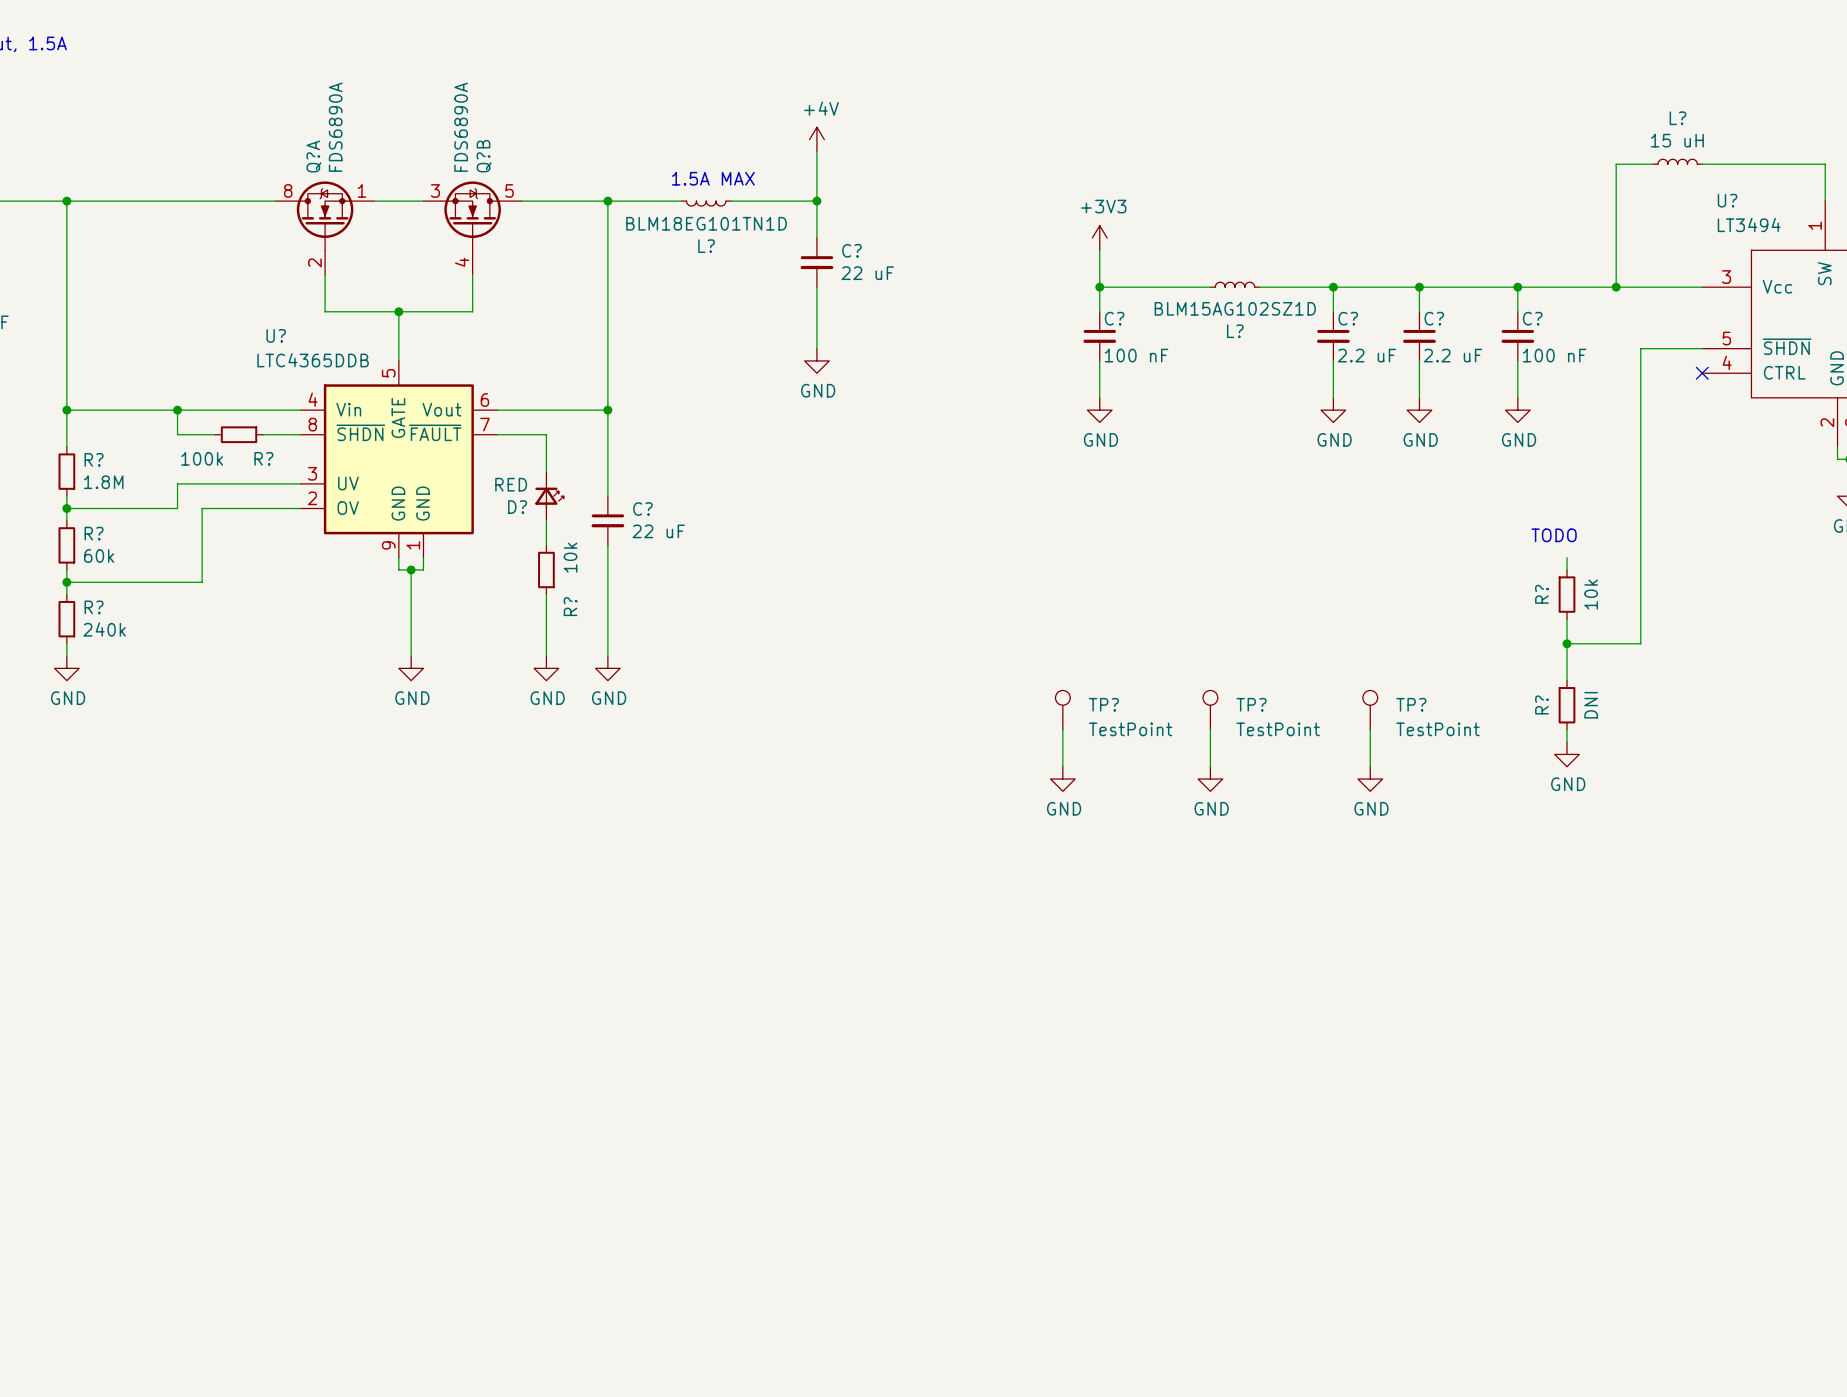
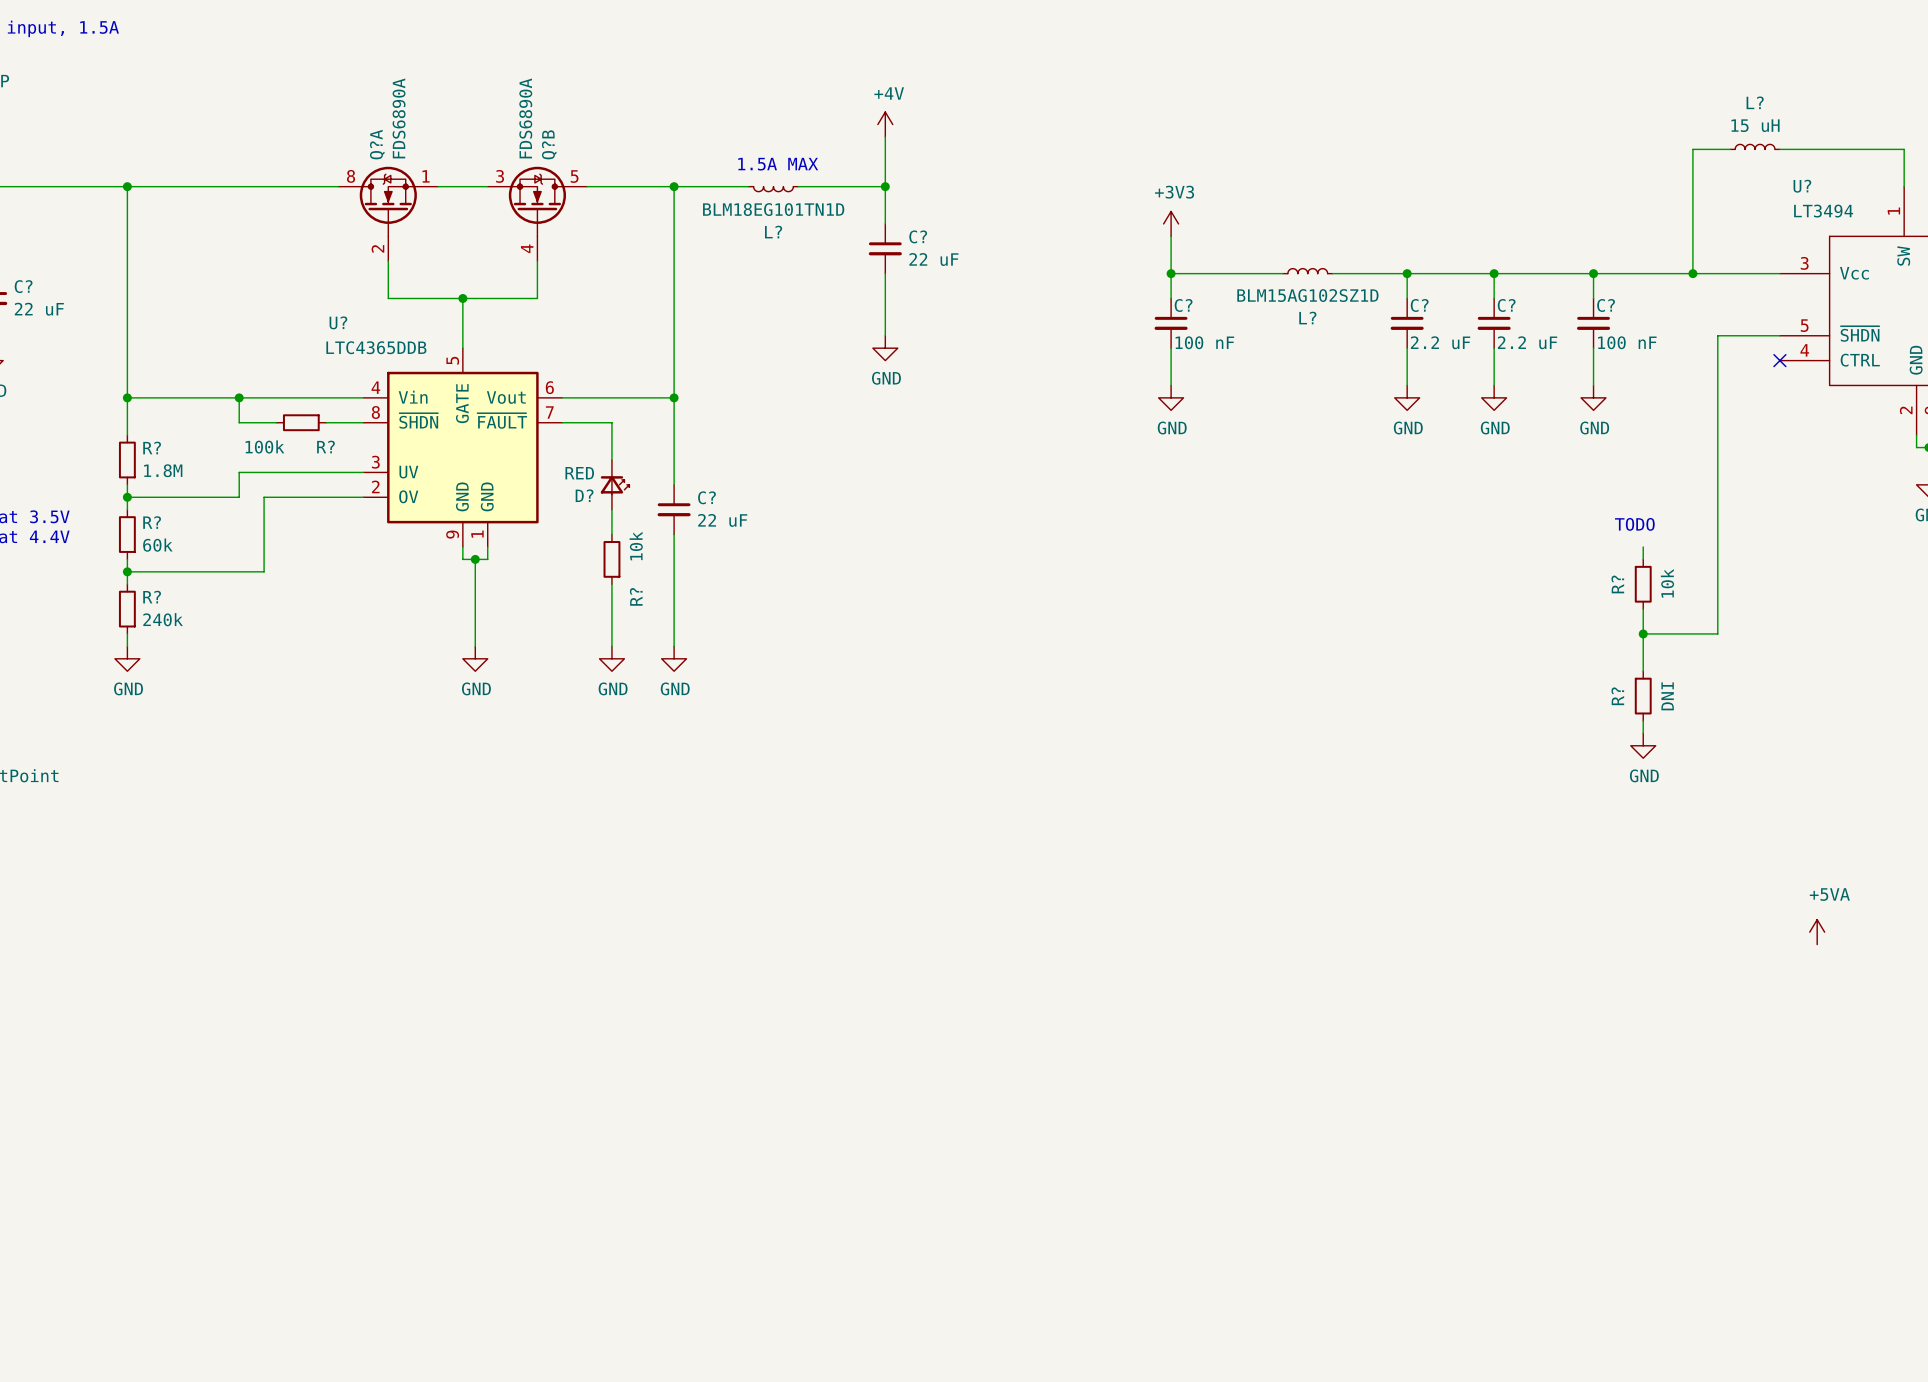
TP?: TestPoint (1062, 710) -> none
TP?: TestPoint (1210, 710) -> none
TP?: TestPoint (1370, 710) -> none
wire: (1062, 729) (1062, 766) -> none
wire: (1210, 729) (1210, 766) -> none
wire: (1370, 729) (1370, 766) -> none
power symbol: GND (1062, 779) -> none
power symbol: GND (1210, 779) -> none
power symbol: GND (1370, 779) -> none
power symbol: none -> +5VA (1817, 932)

